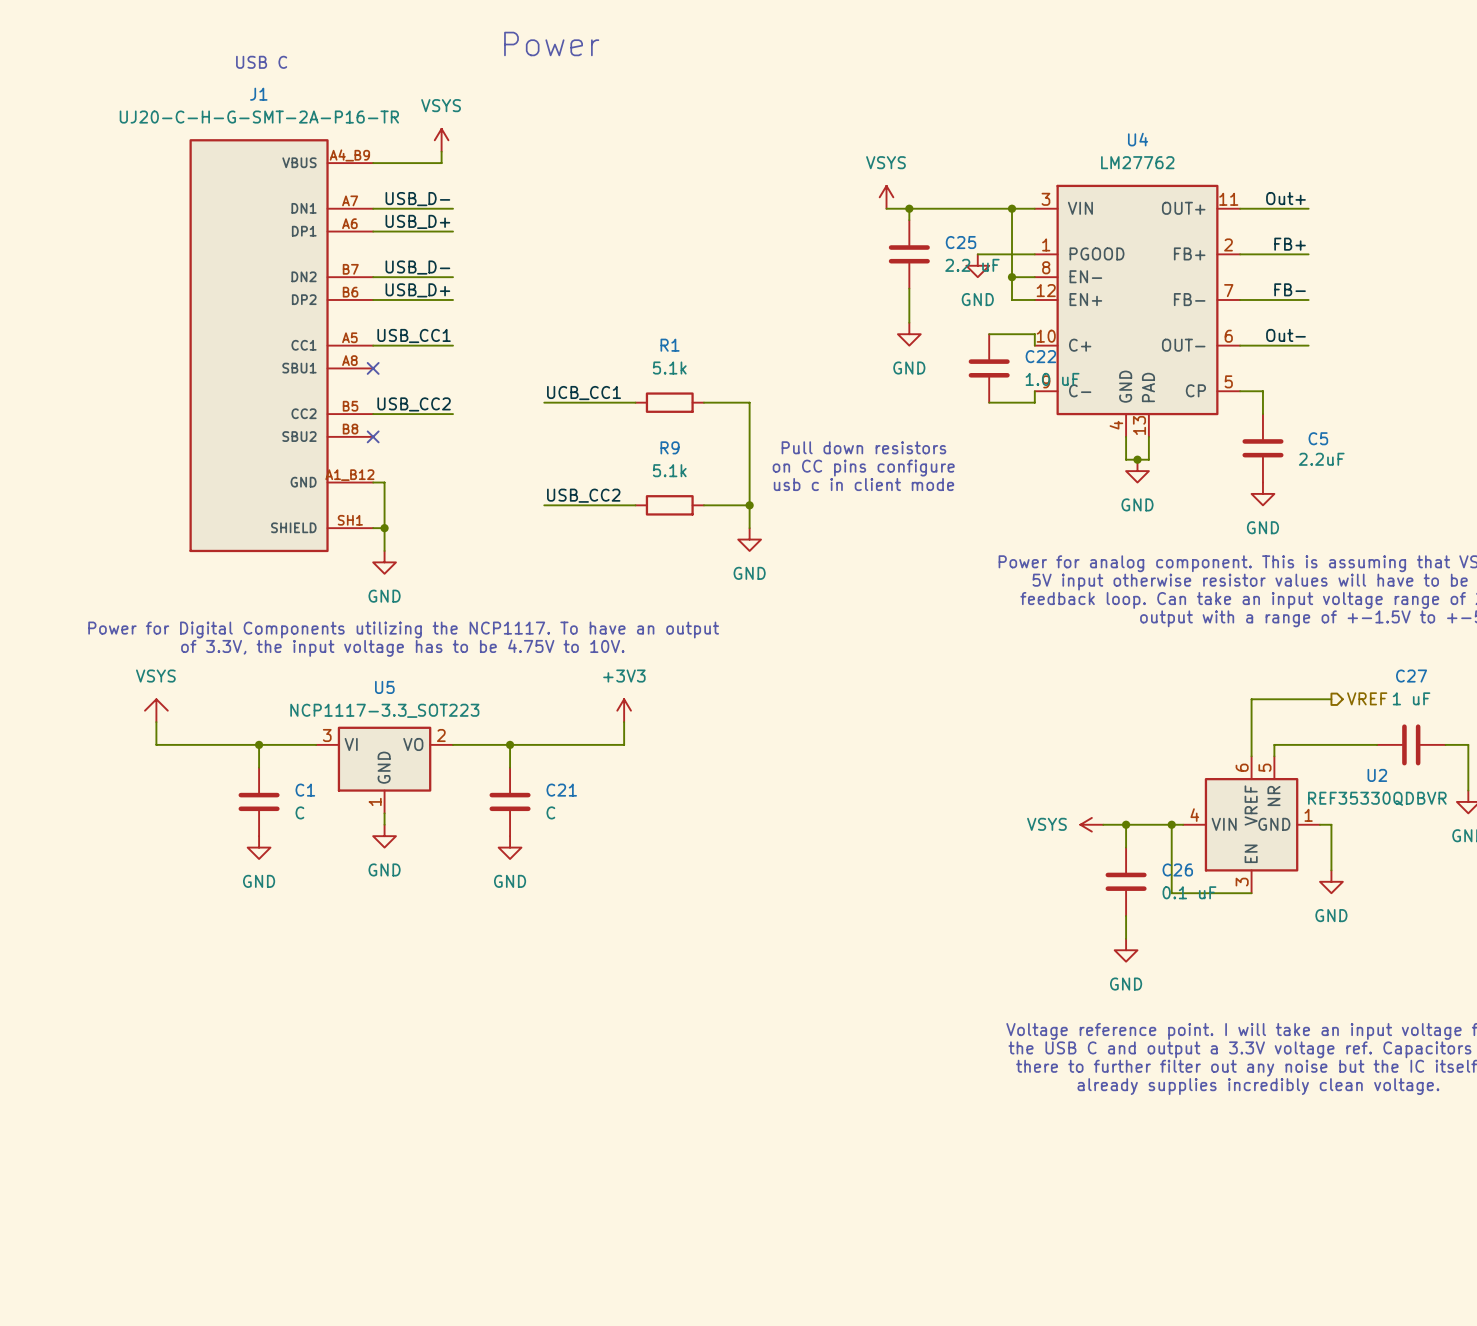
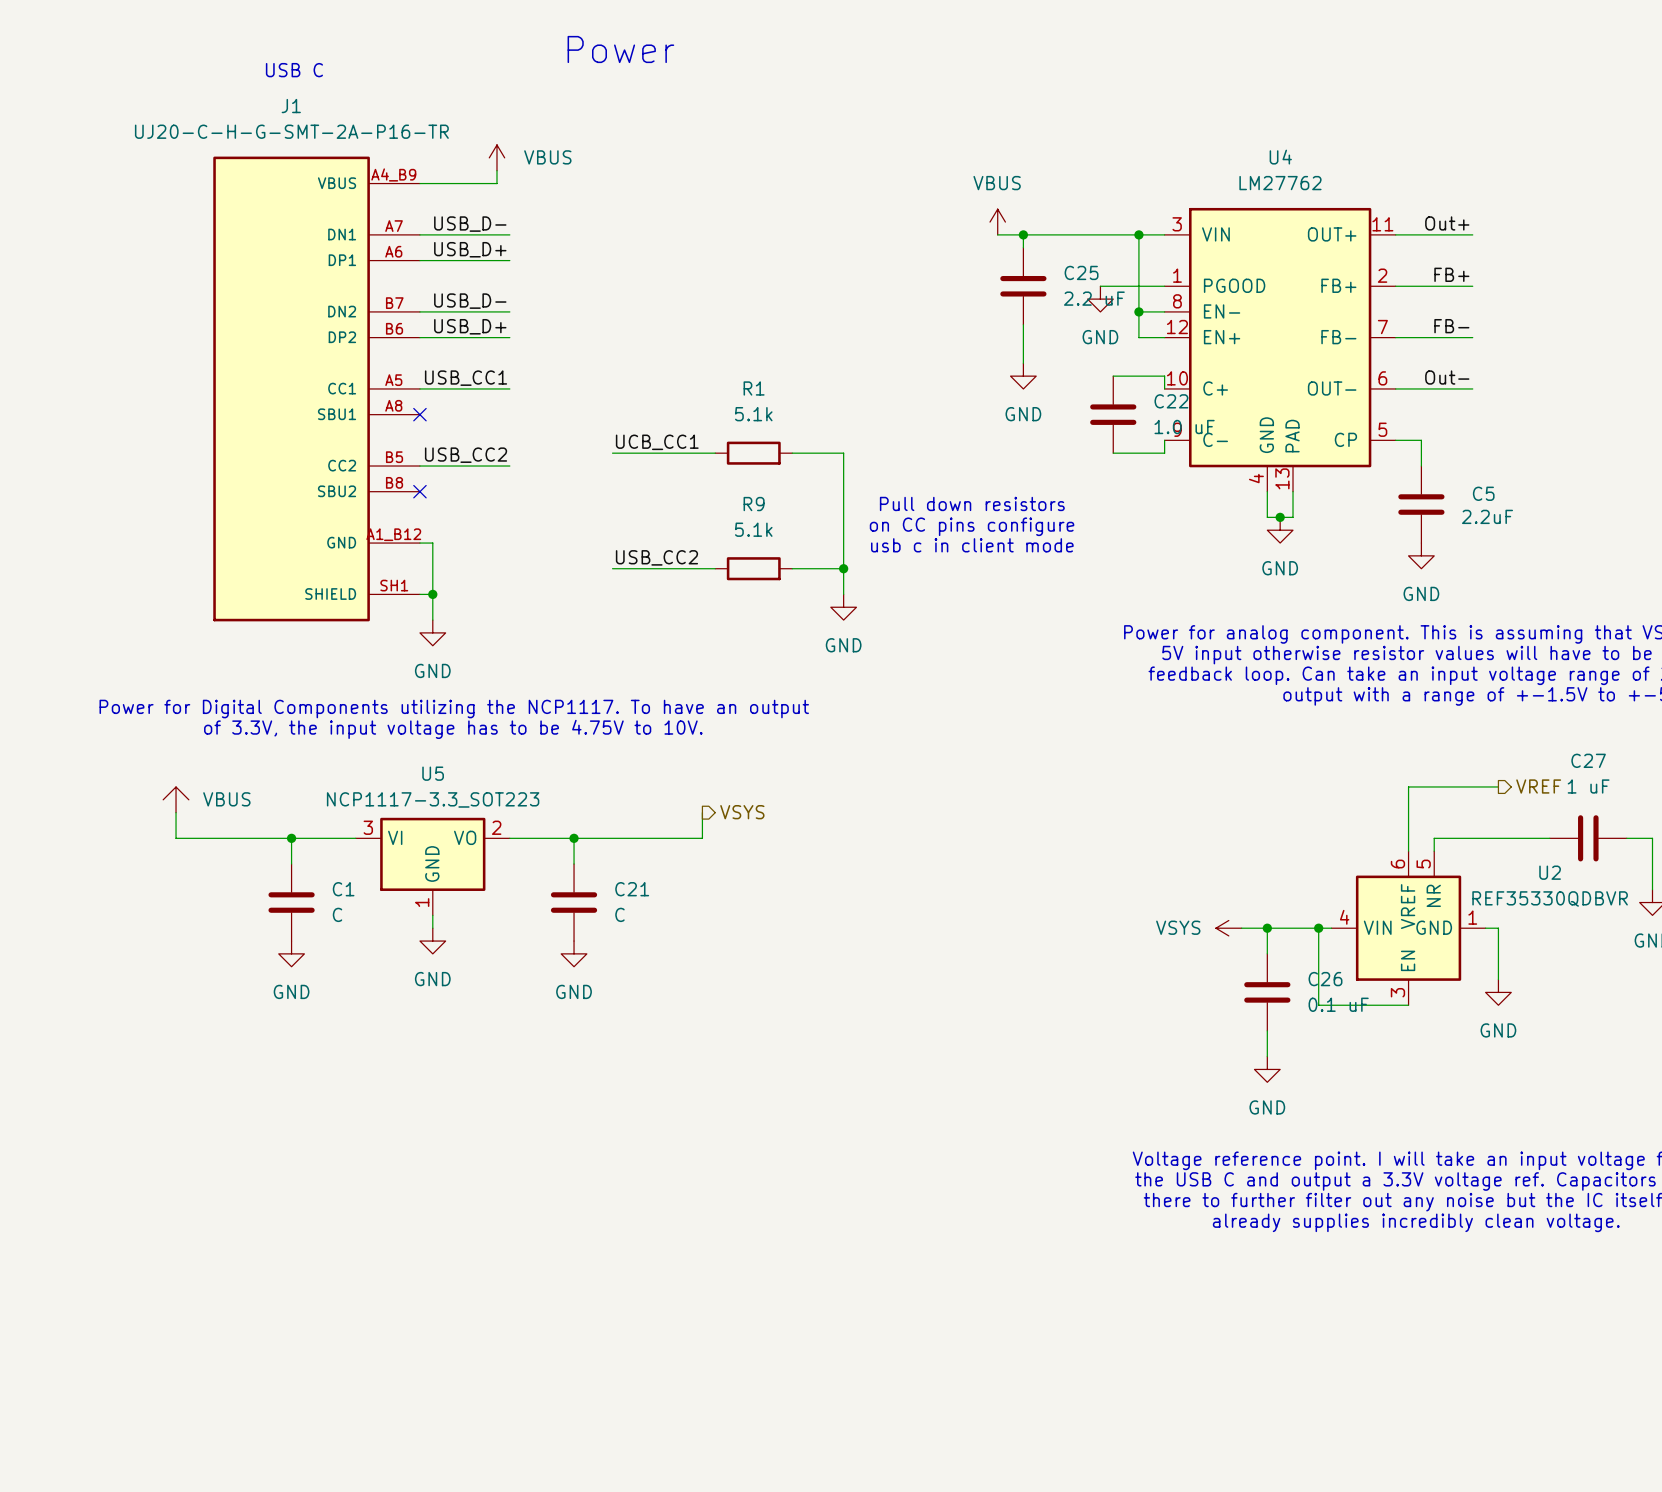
power symbol: VSYS (441, 140) -> VBUS (496, 157)
power symbol: VSYS (886, 197) -> VBUS (997, 222)
power symbol: VSYS (156, 710) -> VBUS (176, 799)
power symbol: +3V3 (624, 710) -> none
hierarchical label: none -> VSYS (742, 812)

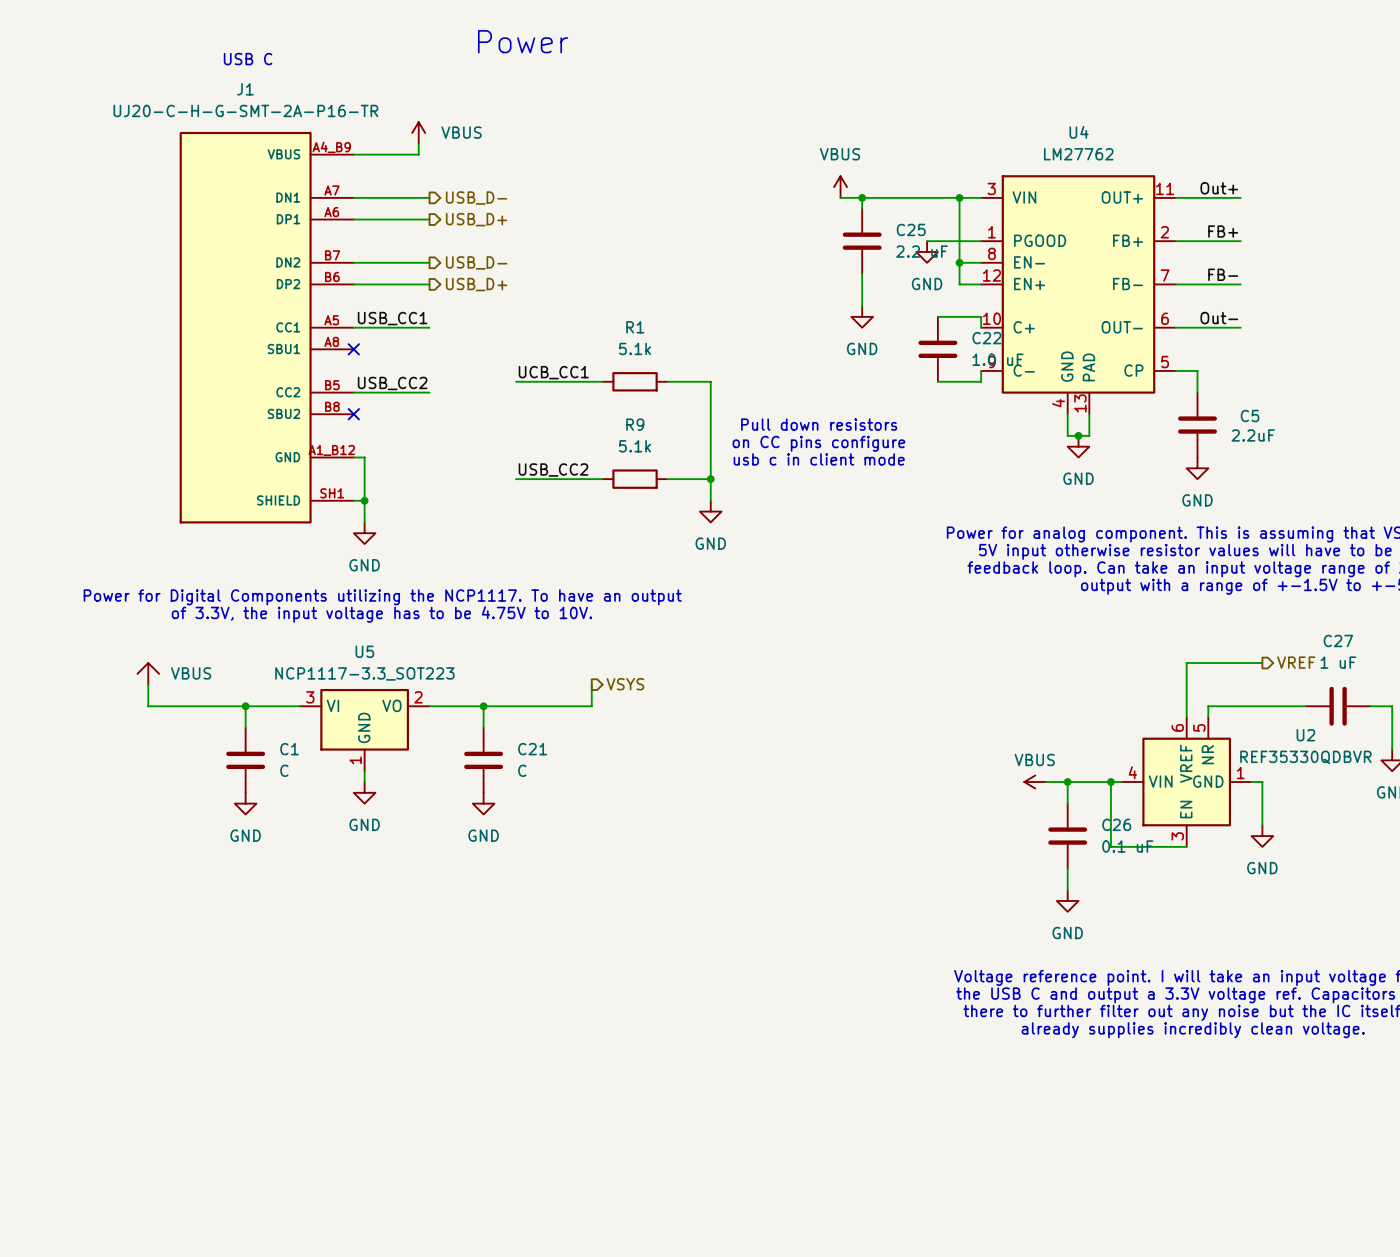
label: USB_D- (470, 224) -> none
hierarchical label: none -> USB_D- (476, 198)
label: USB_D+ (470, 249) -> none
hierarchical label: none -> USB_D+ (476, 219)
label: USB_D- (470, 301) -> none
hierarchical label: none -> USB_D- (476, 262)
label: USB_D+ (470, 326) -> none
hierarchical label: none -> USB_D+ (476, 284)
power symbol: VSYS (1228, 928) -> VBUS (1035, 782)

